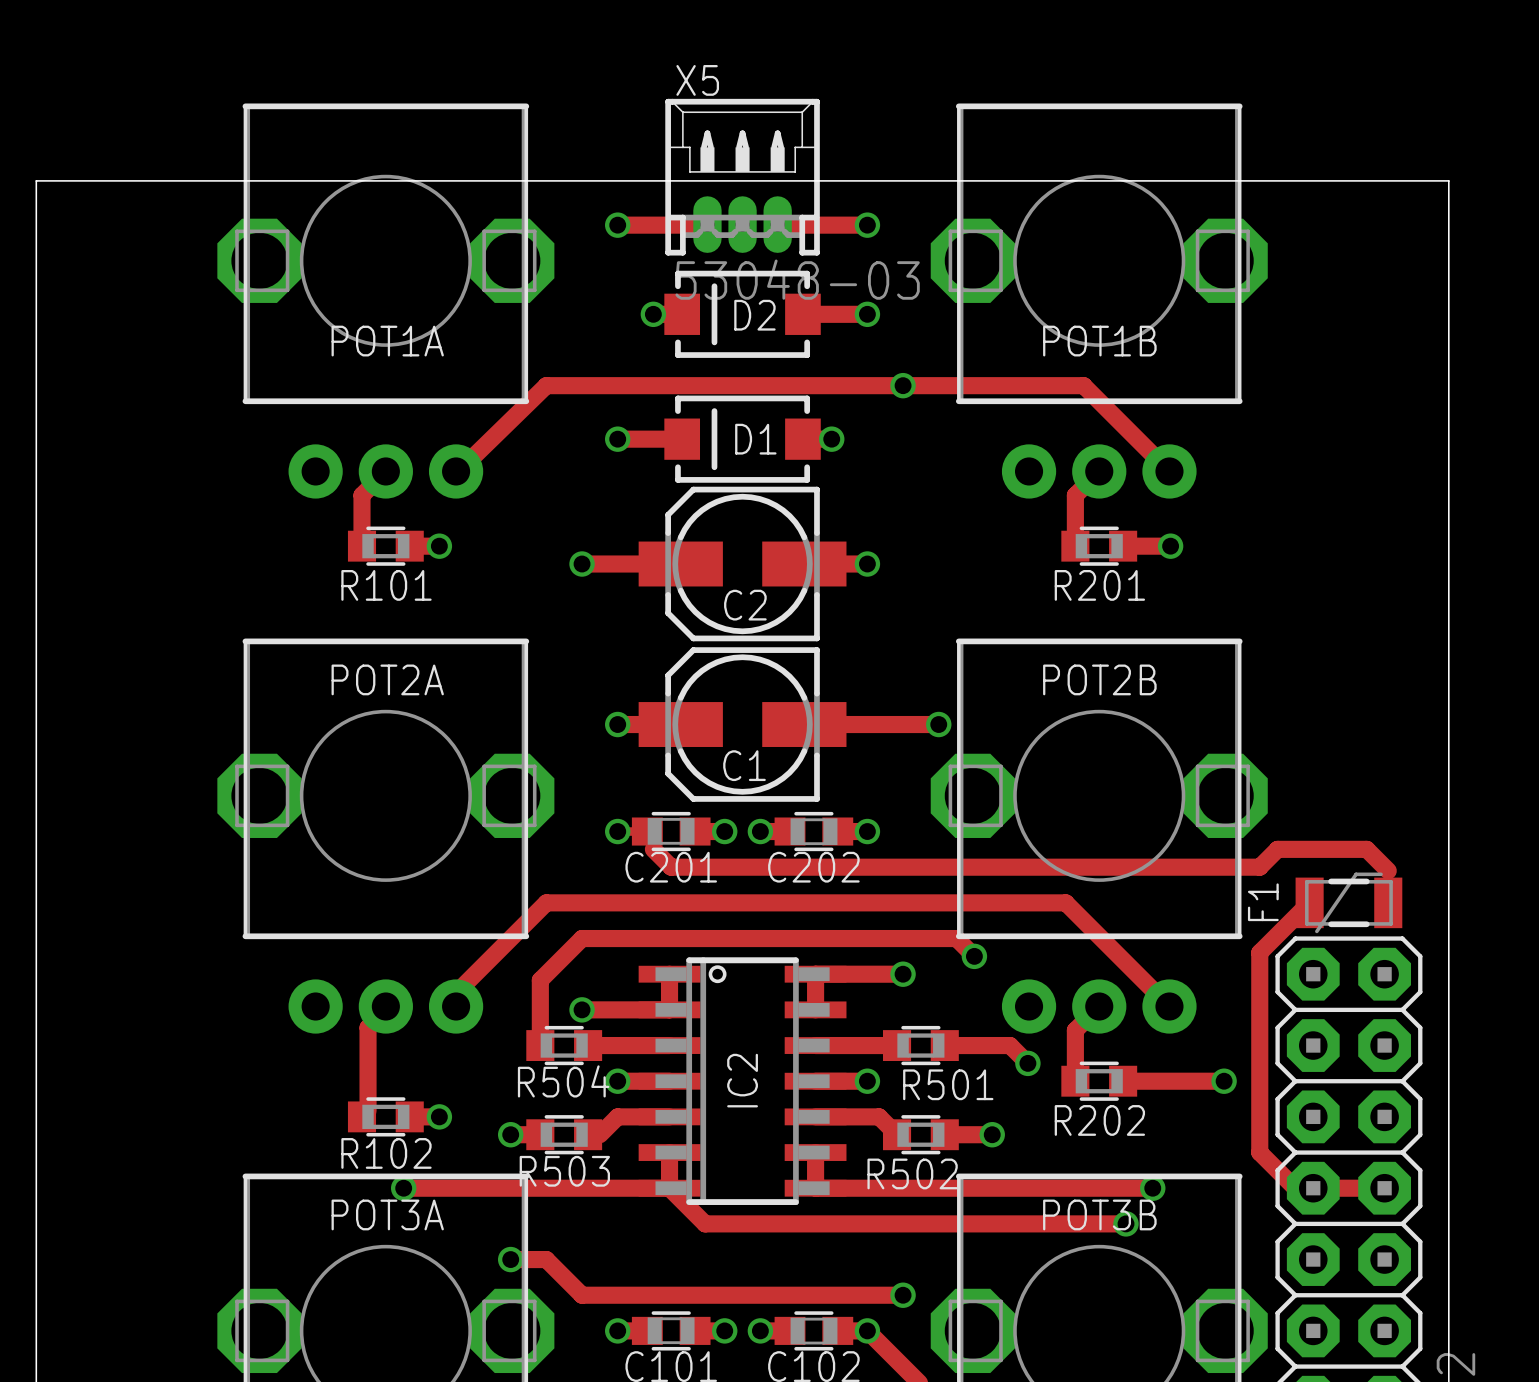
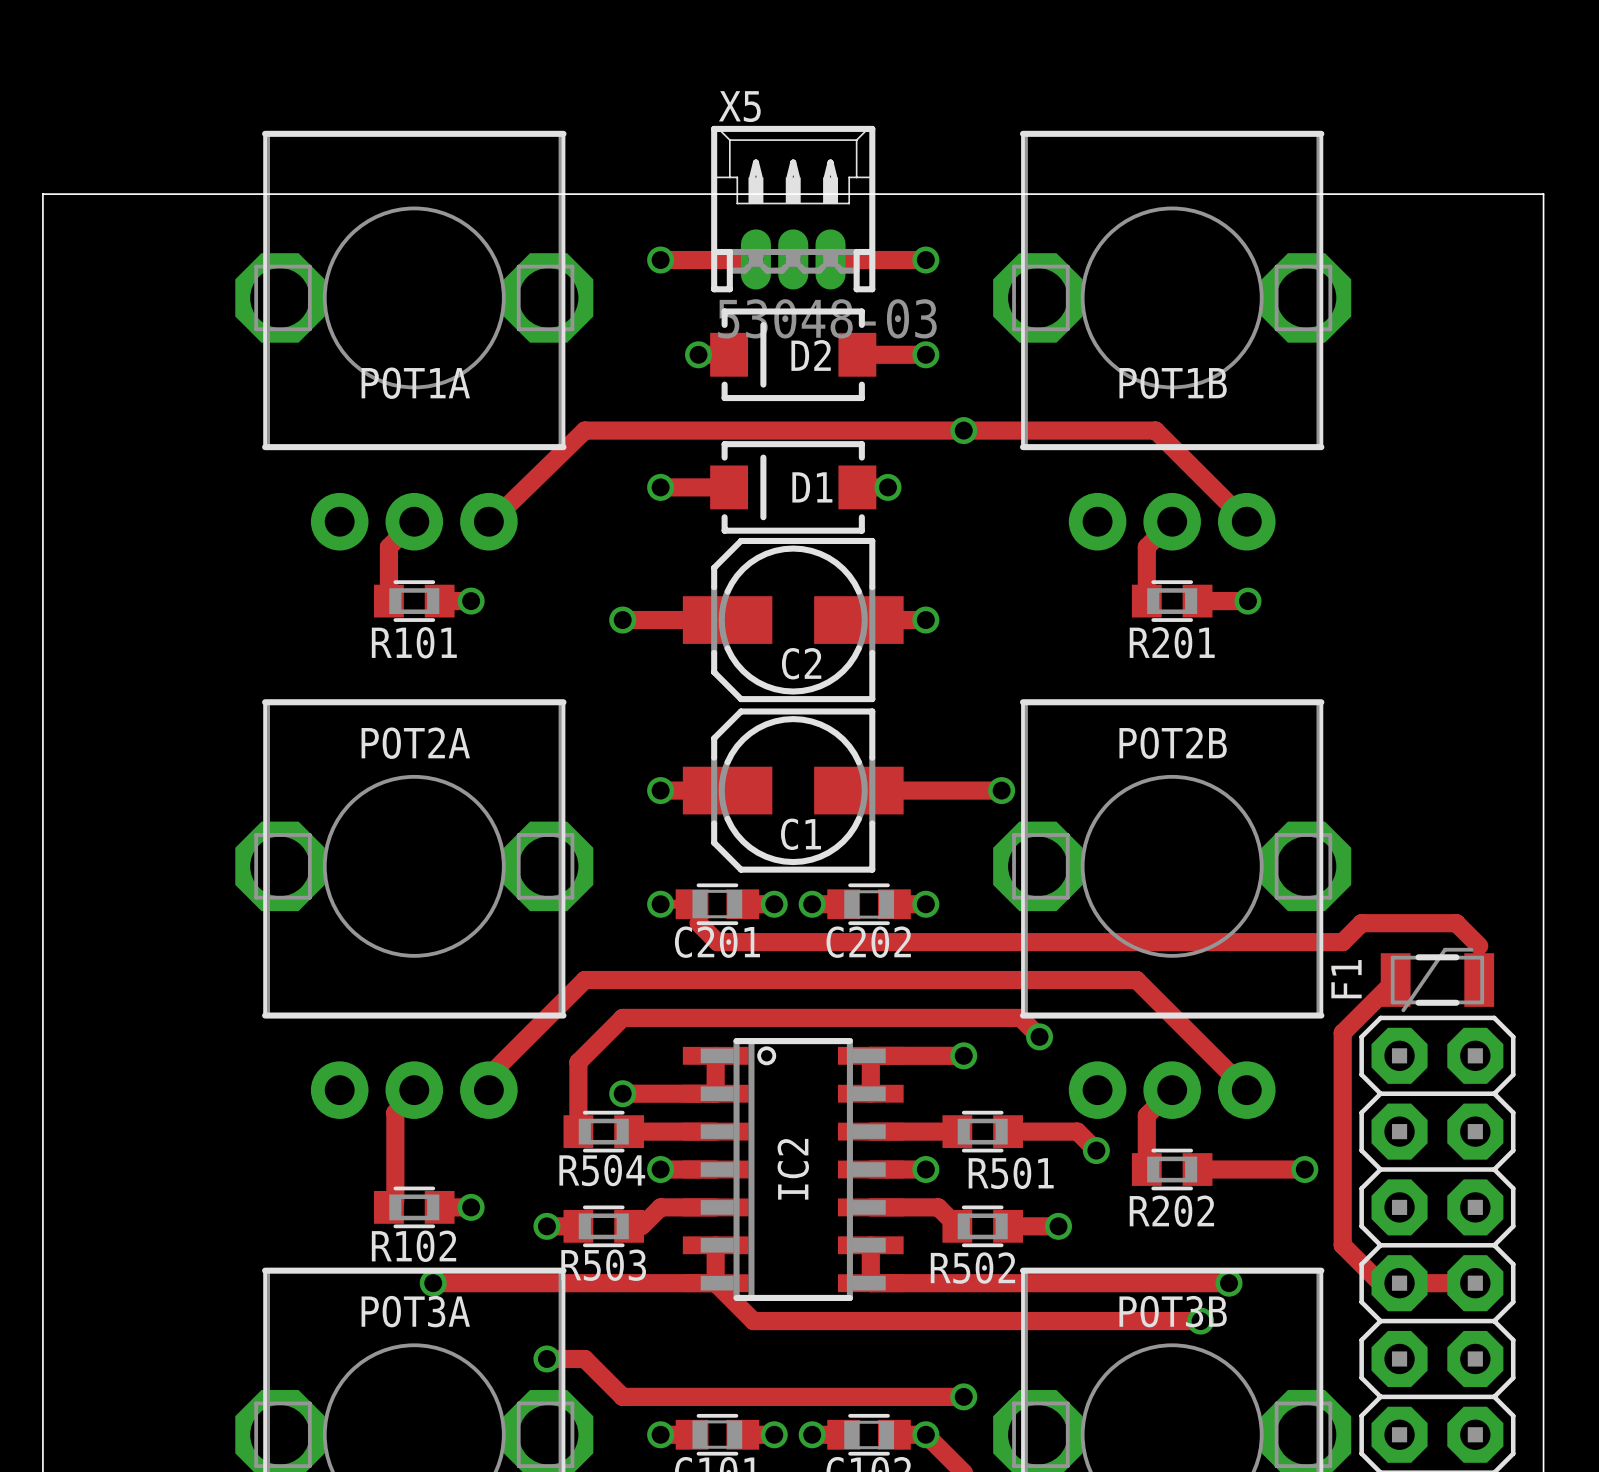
board edge: (36, 180) (1448, 180) -> (42, 213) (42, 194) (1543, 194) (1543, 213)

